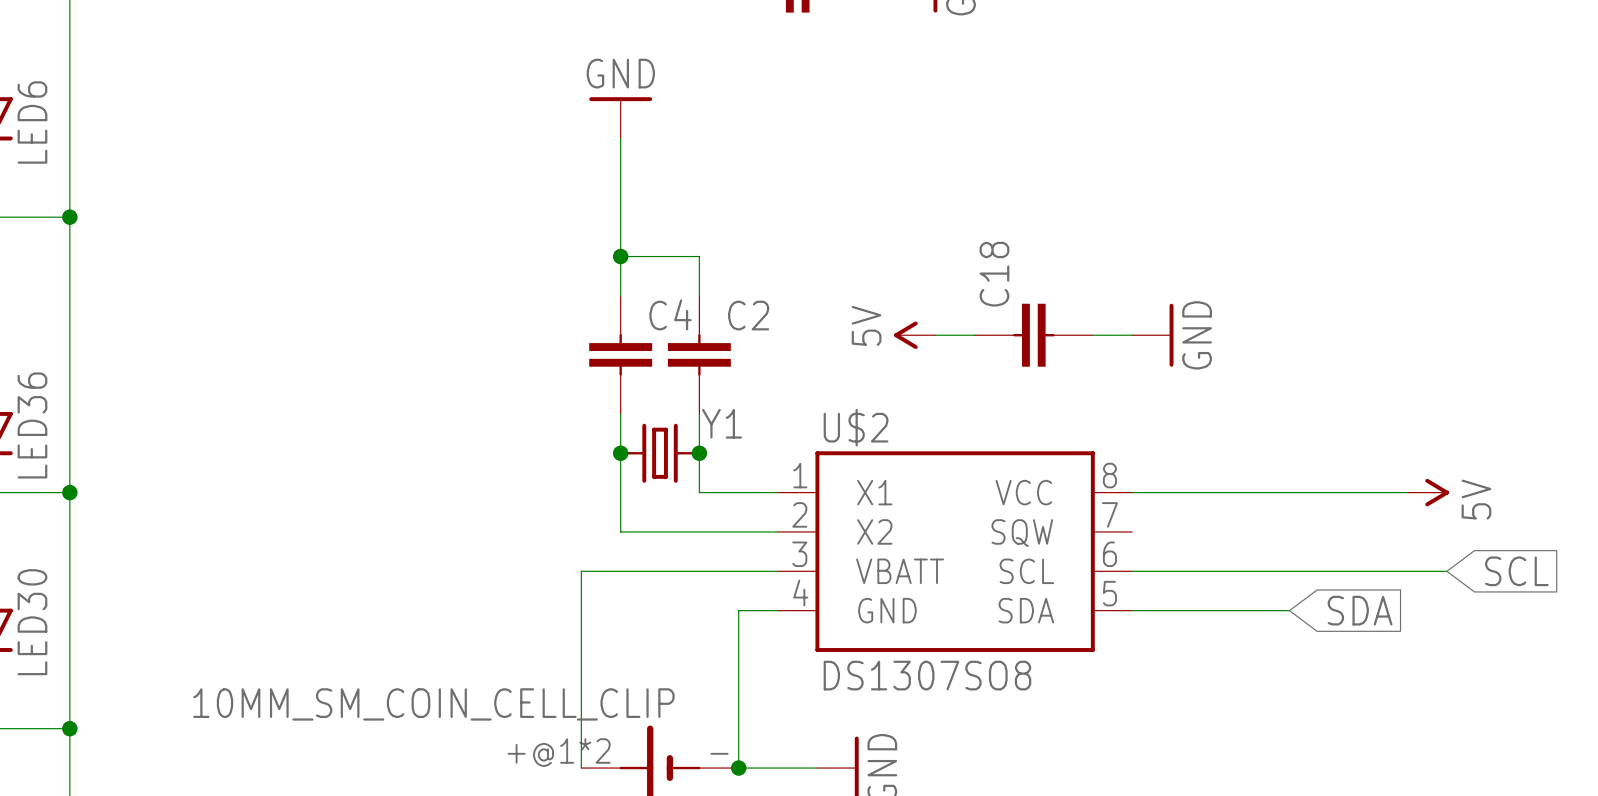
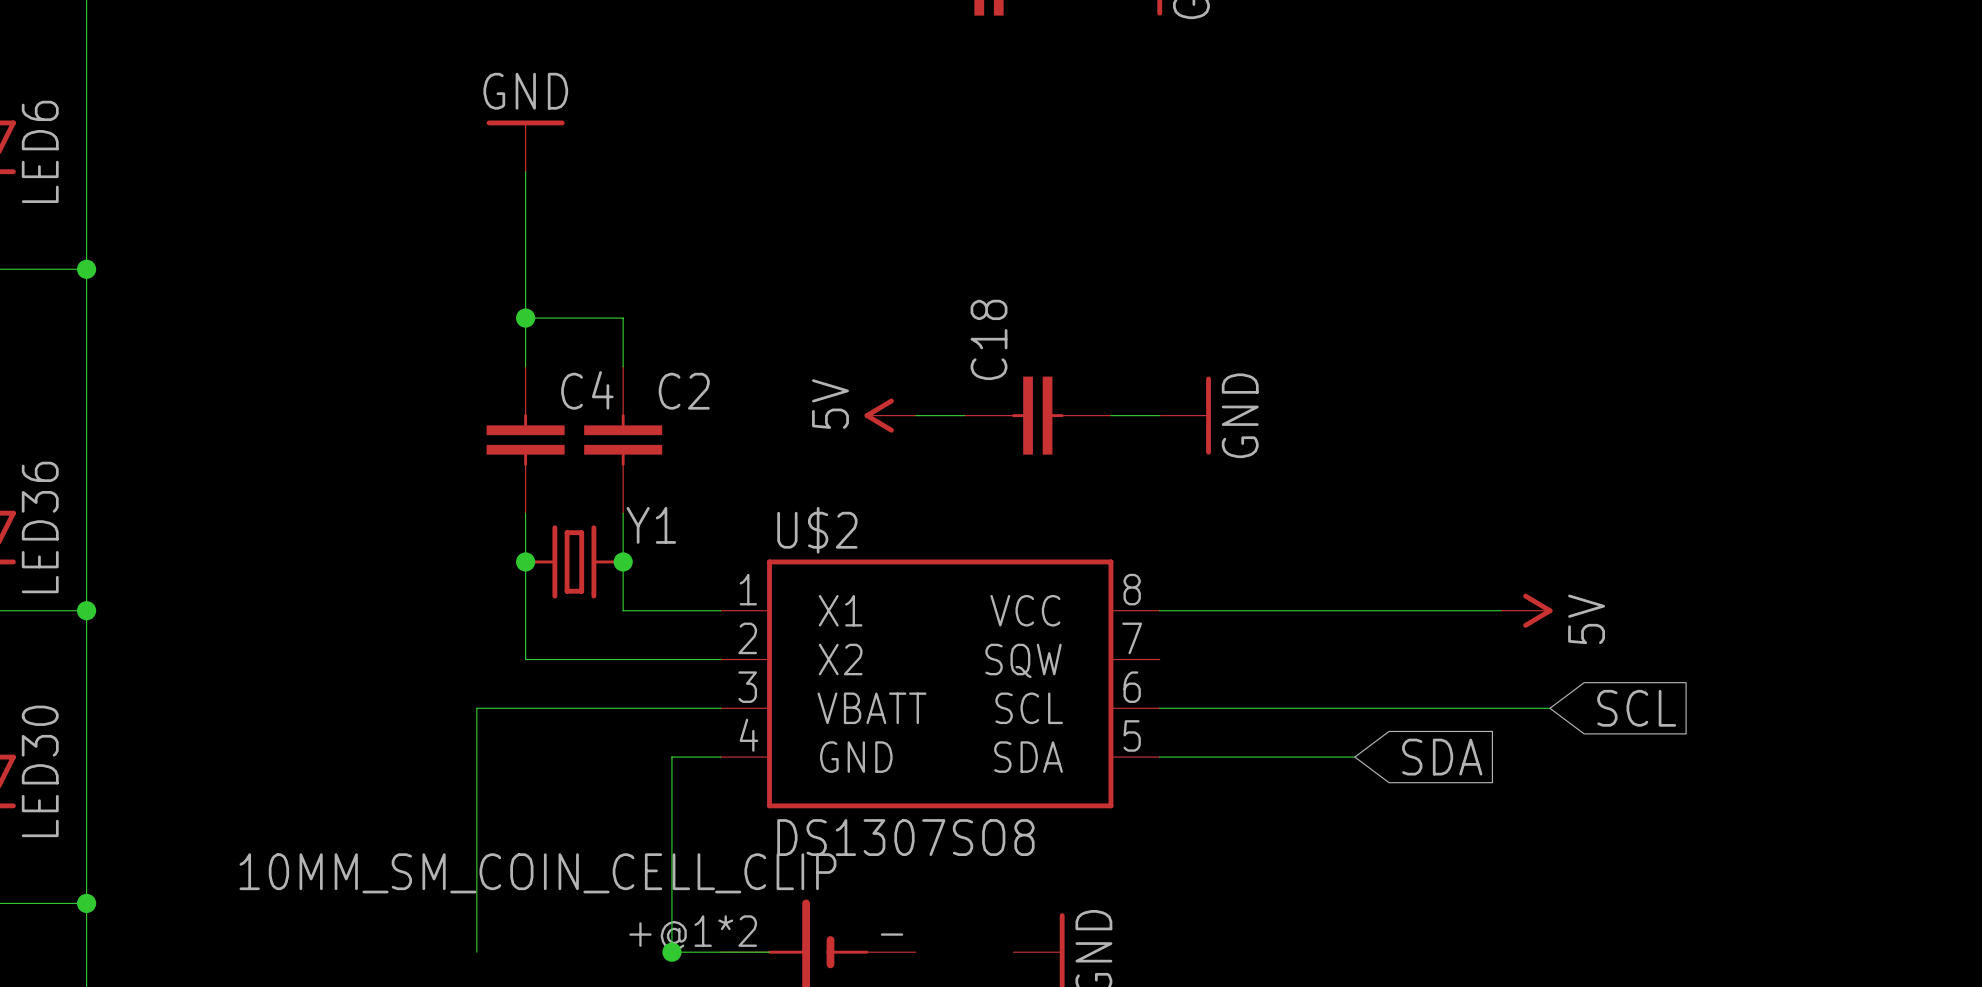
power symbol position: GND (620, 117) -> GND (525, 146)
wire: (620, 138) (620, 295) -> (525, 171) (525, 366)
junction: none -> (525, 318)
wire: (620, 256) (699, 256) (699, 295) -> (525, 318) (623, 318) (623, 366)
junction: (620, 256) -> none
power symbol: none -> 5V (890, 415)
power symbol: 5V (914, 335) -> none
C18 position: (1033, 335) -> (1037, 415)
wire: (1092, 335) (1132, 335) -> (915, 415) (964, 415)
power symbol position: GND (1152, 335) -> GND (1185, 415)
C4 position: (620, 354) -> (525, 440)
C2 position: (699, 354) -> (623, 440)
wire: (620, 413) (620, 531) (778, 531) -> (525, 513) (525, 659) (720, 659)
wire: (699, 413) (699, 492) (778, 492) -> (623, 513) (623, 610) (720, 610)
junction: none -> (525, 561)
junction: none -> (623, 561)
junction: (620, 453) -> none
Y1 position: (660, 453) -> (574, 561)
junction: (699, 453) -> none
wire: (1210, 492) (1407, 492) -> (1159, 610) (1403, 610)
power symbol: none -> 5V (1526, 610)
power symbol: 5V (1428, 492) -> none
U$2 position: (955, 551) -> (940, 683)
wire: (778, 571) (581, 571) (581, 768) -> (720, 708) (476, 708) (476, 952)
wire: (1250, 571) (1446, 571) -> (1159, 708) (1403, 708)
global label position: SCL (1516, 571) -> SCL (1636, 708)
wire: (778, 610) (738, 610) (738, 768) (817, 768) -> (720, 757) (671, 757) (671, 952) (769, 952)
wire: (1132, 610) (1289, 610) -> (1159, 757) (1354, 757)
global label position: SDA (1360, 610) -> SDA (1442, 757)
junction: none -> (671, 952)
junction: (738, 768) -> none

